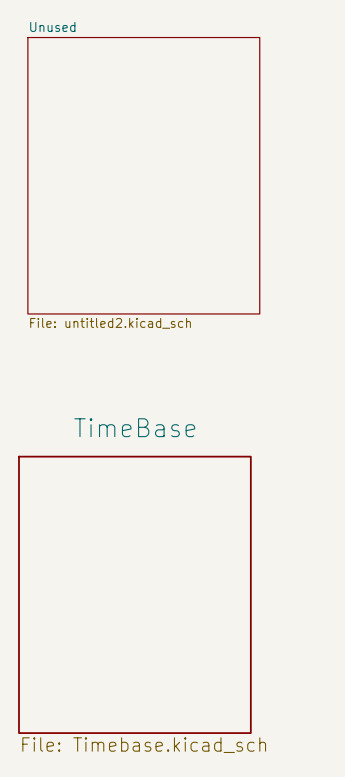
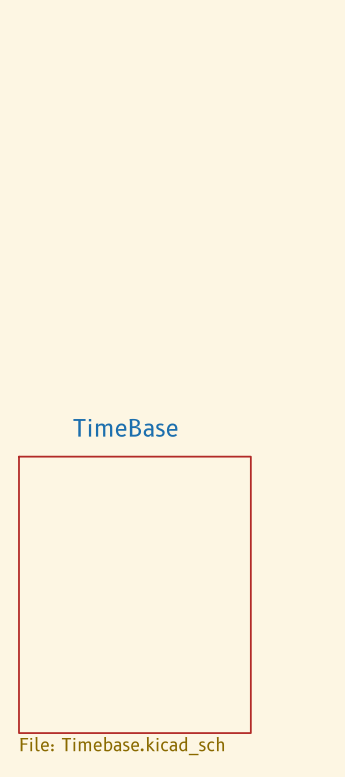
sheet Unused: File: untitled2.kicad_sch (143, 175) -> none

